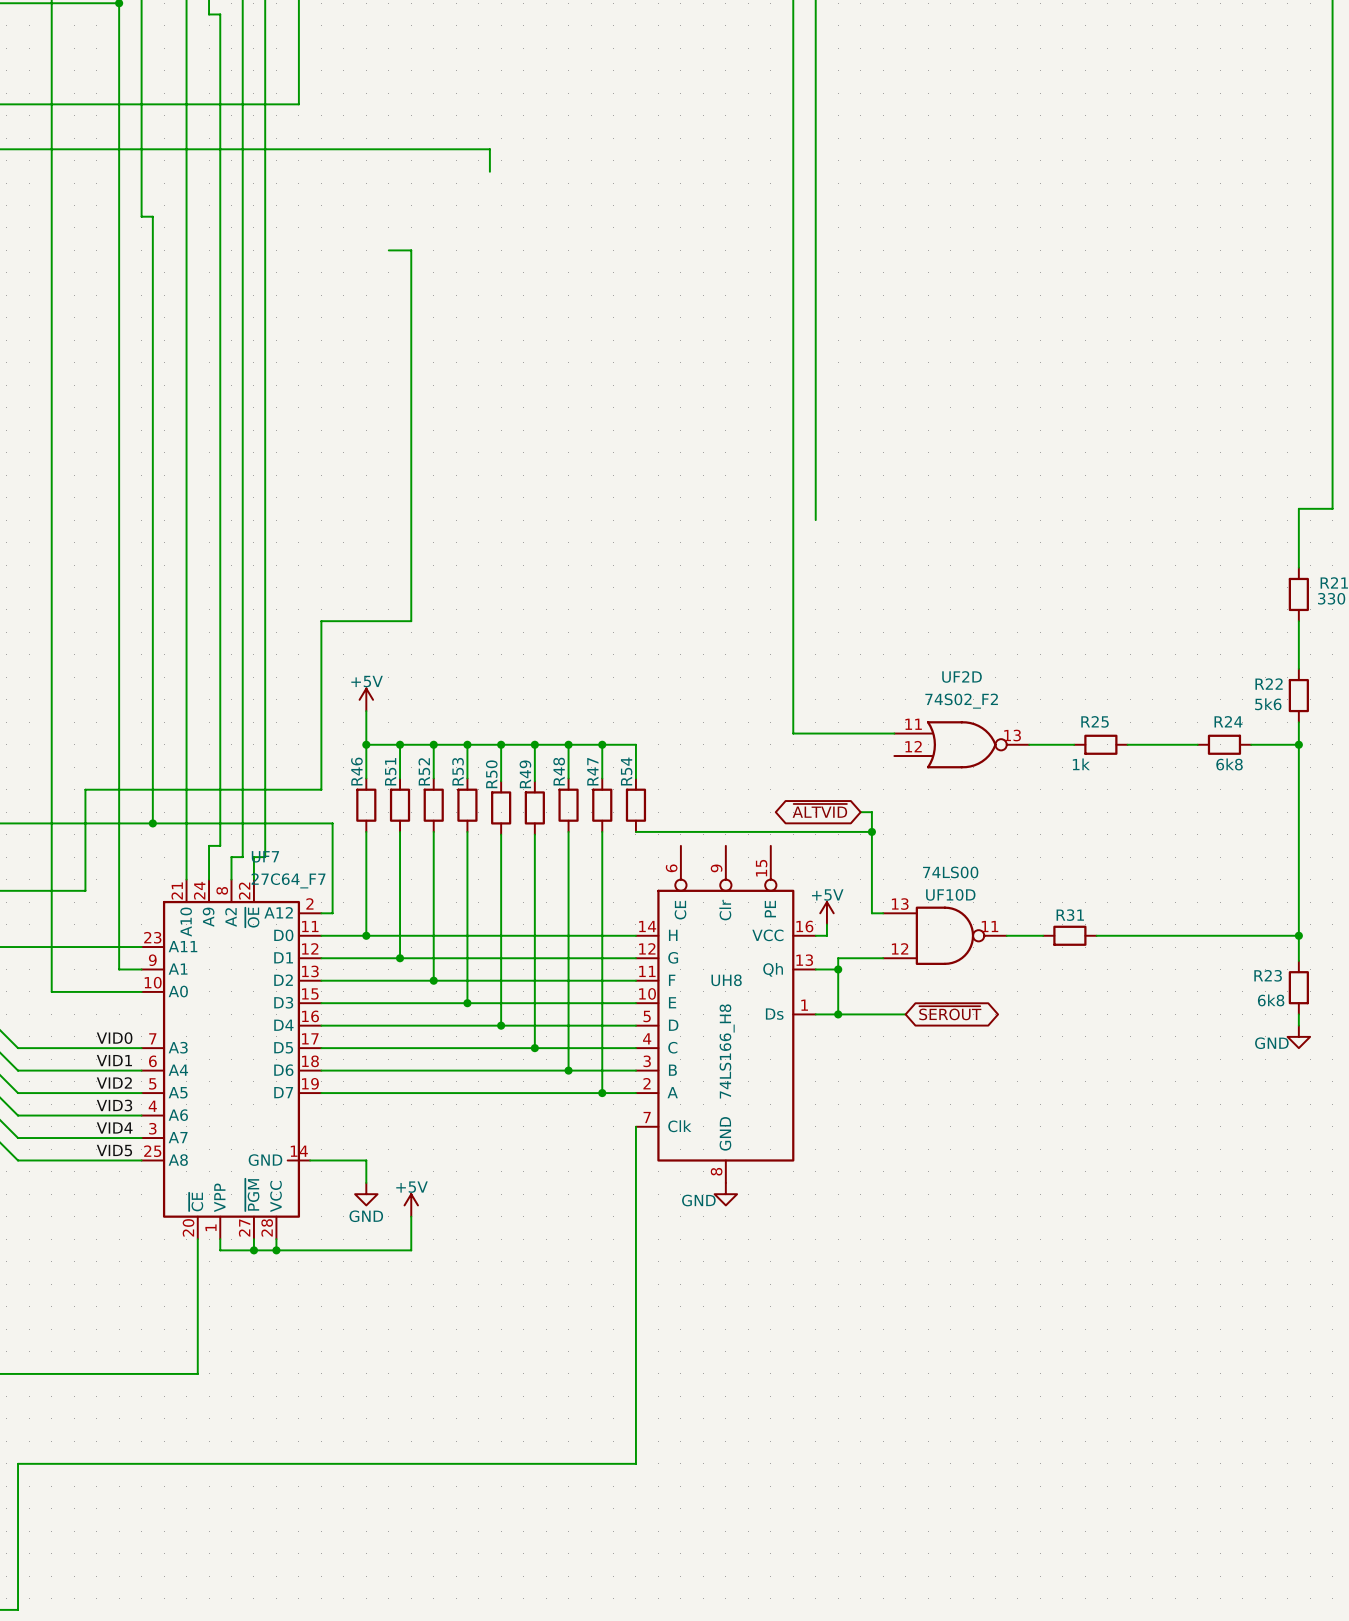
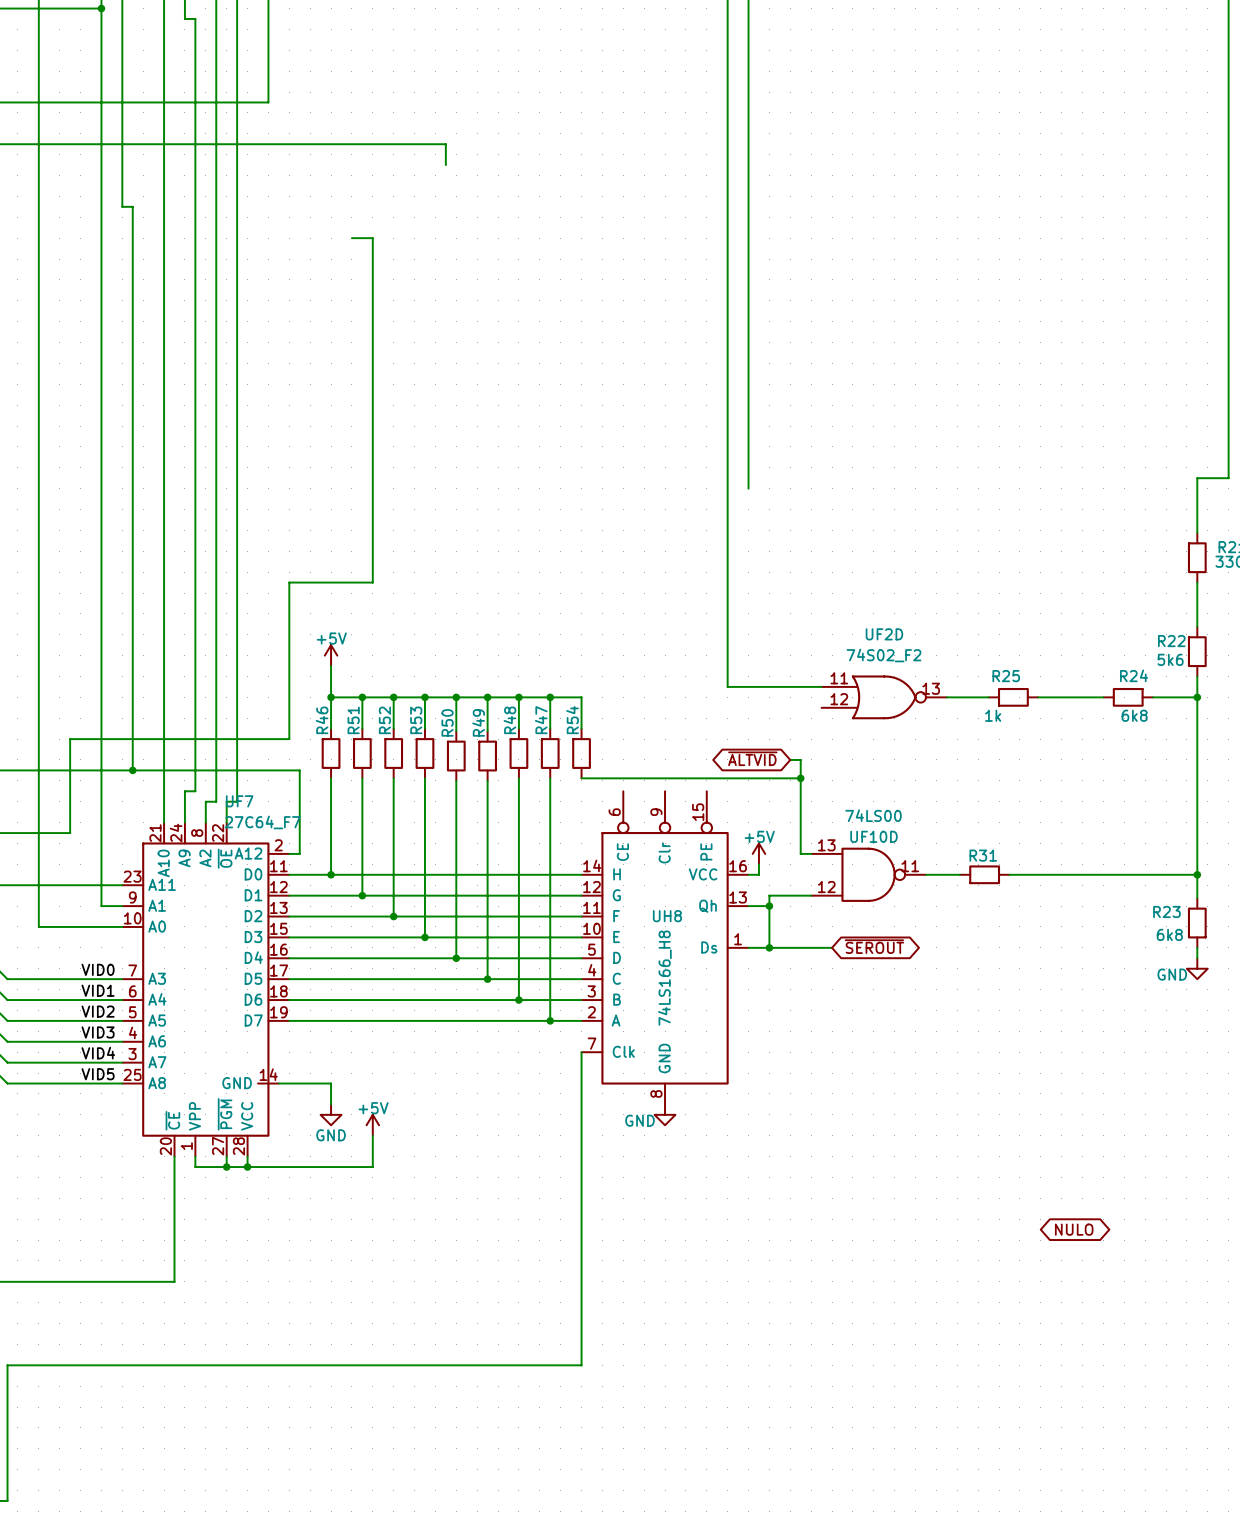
global label: none -> NULO (1074, 1229)

